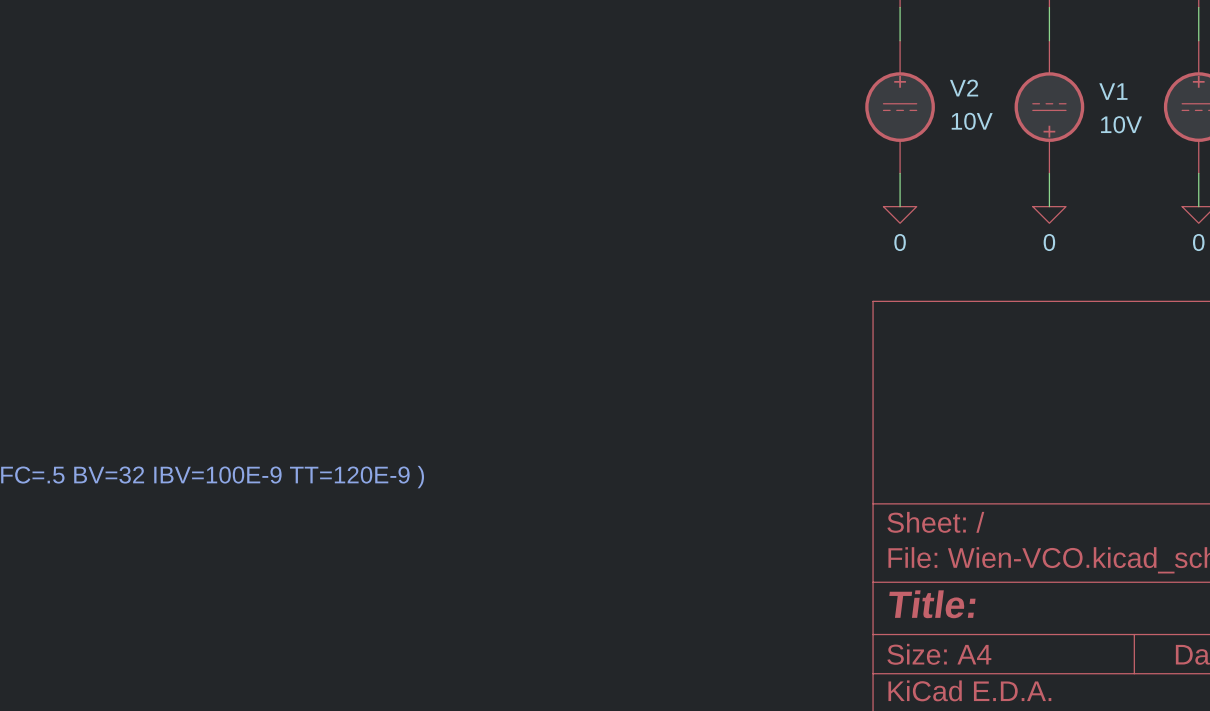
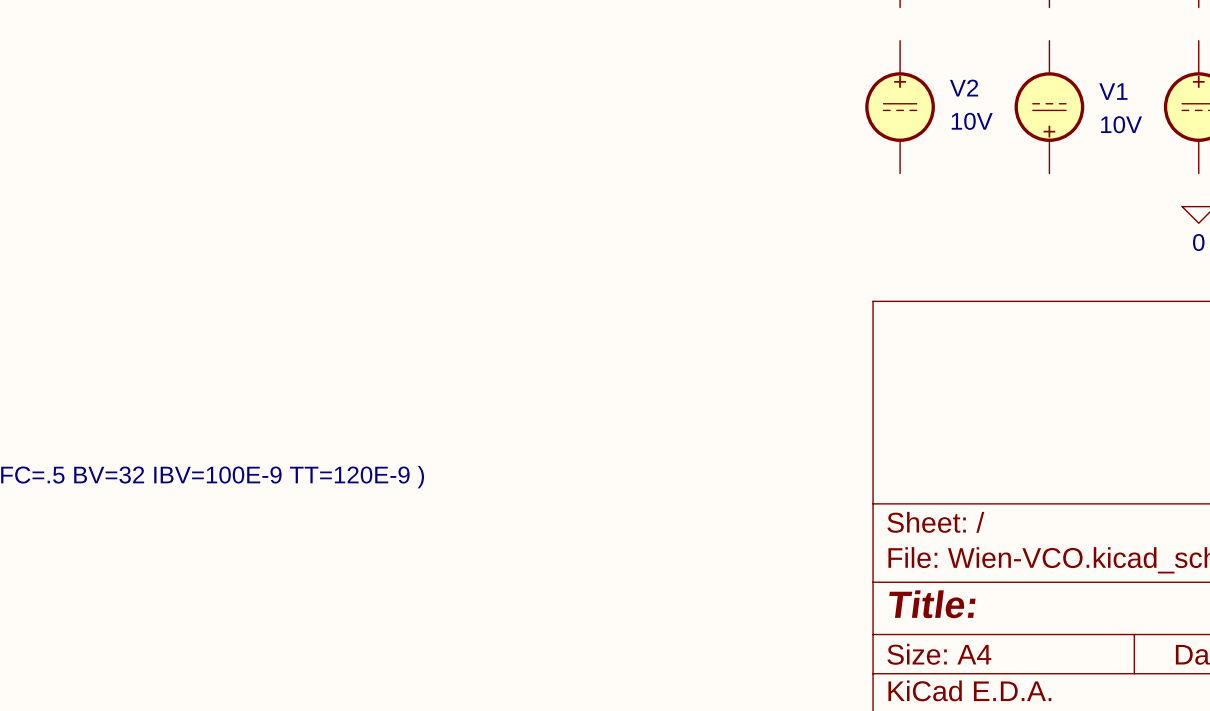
wire: (900, 7) (900, 40) -> none
wire: (1049, 7) (1049, 40) -> none
wire: (1198, 7) (1198, 40) -> none
wire: (900, 173) (900, 206) -> none
wire: (1049, 173) (1049, 206) -> none
wire: (1198, 173) (1198, 206) -> none
power symbol: 0 (900, 214) -> none
power symbol: 0 (1049, 214) -> none

